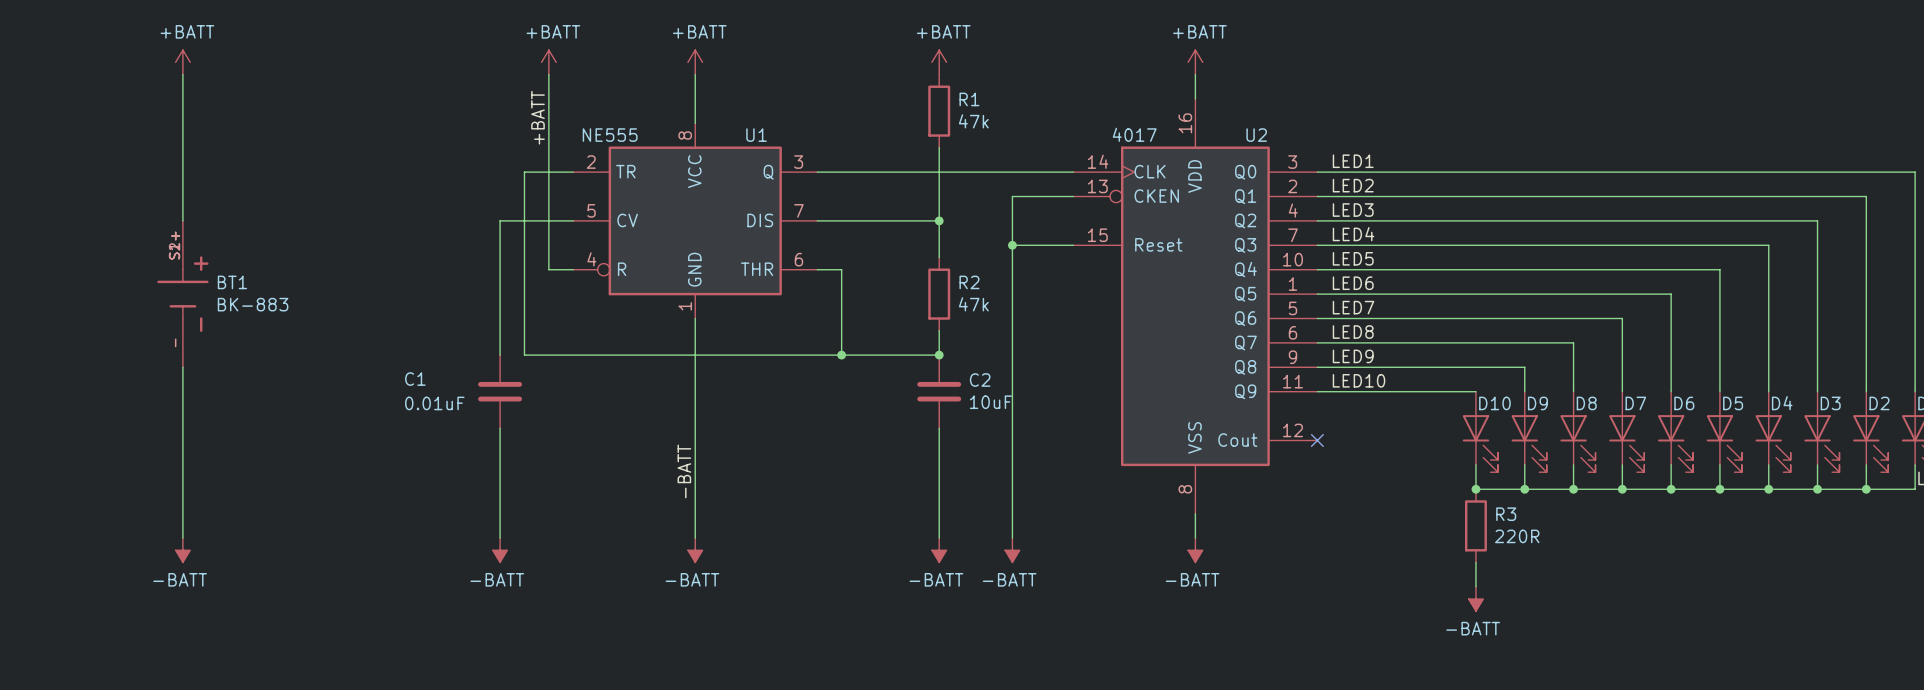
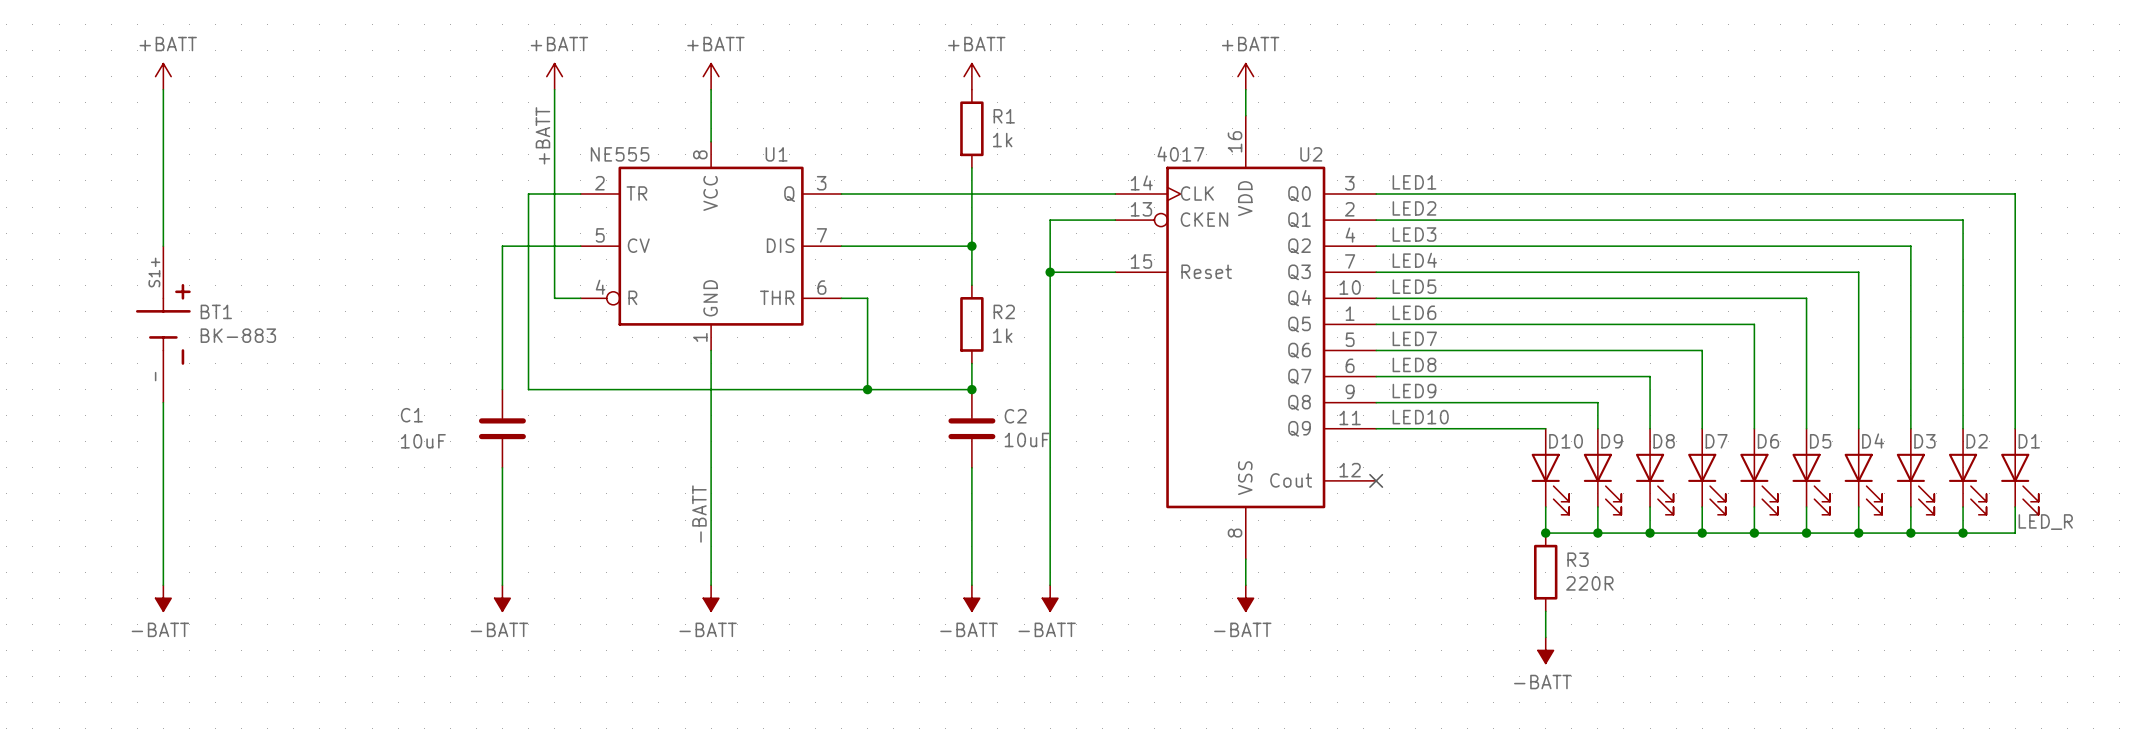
R1 value: 47k (973, 121) -> 1k (1002, 140)
BT1 symbol: [157, 220, 209, 368] -> [135, 246, 191, 403]
R2 value: 47k (973, 304) -> 1k (1002, 335)
C1 value: 0.01uF (434, 403) -> 10uF (423, 441)

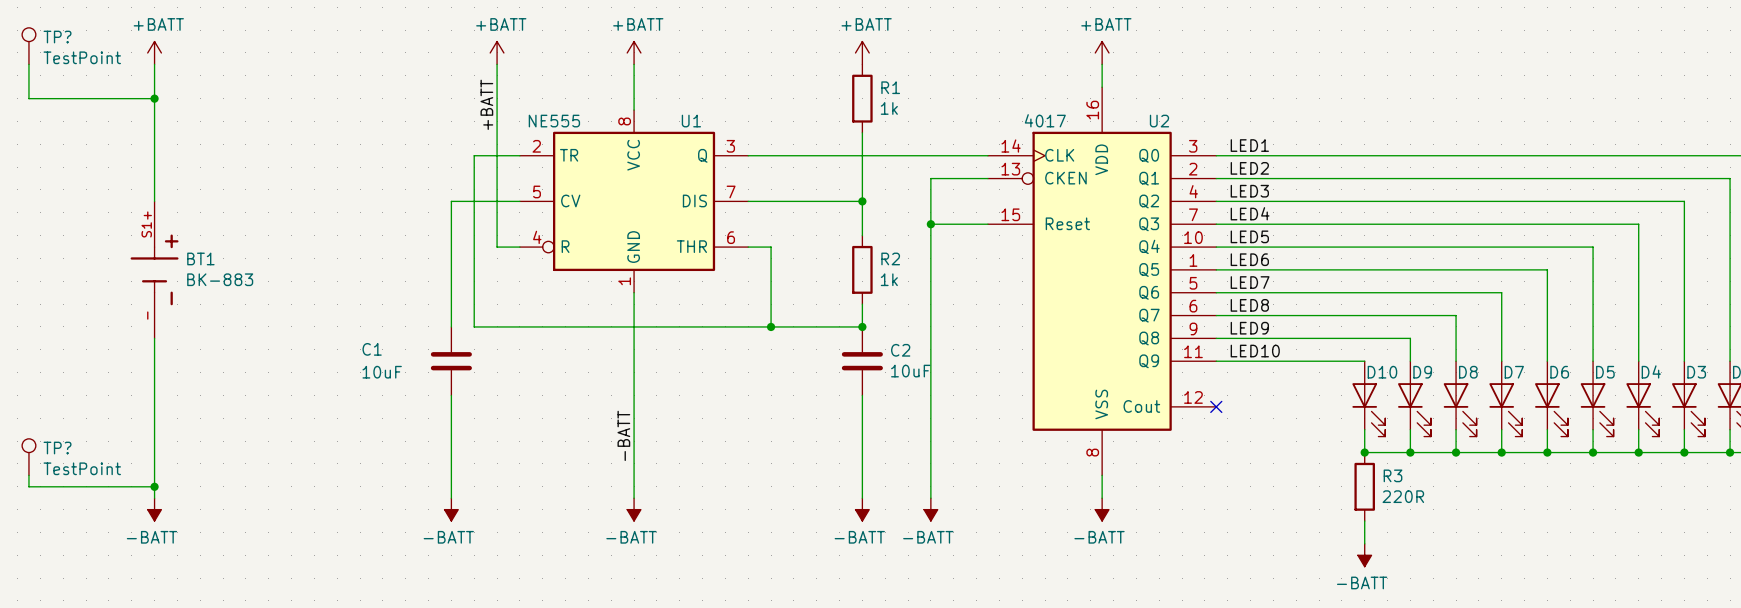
TP?: none -> TestPoint (28, 46)
wire: none -> (28, 64) (28, 98) (154, 98)
junction: none -> (154, 98)
TP?: none -> TestPoint (28, 457)
wire: none -> (28, 475) (28, 486) (154, 486)
junction: none -> (154, 486)

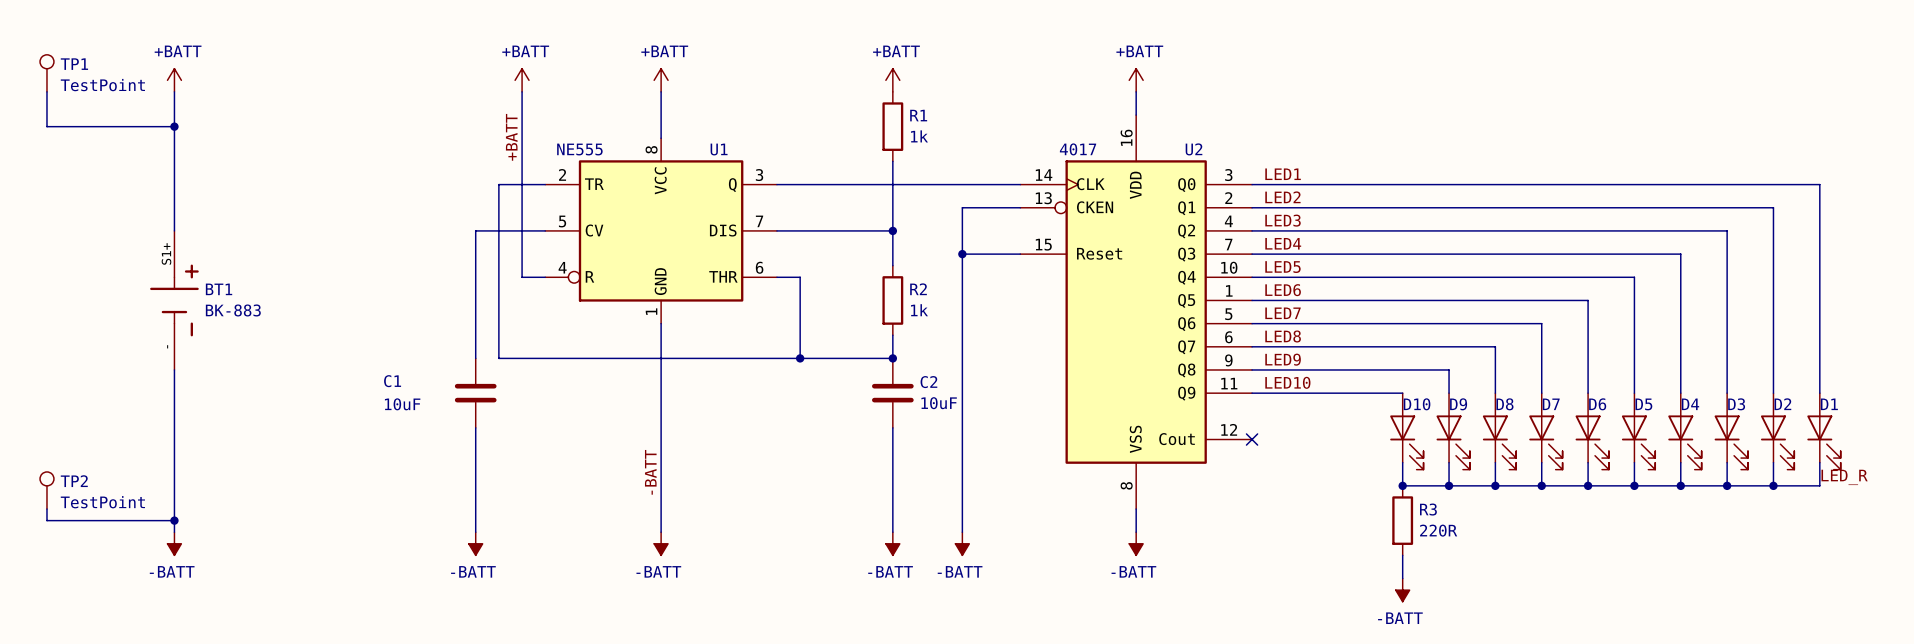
TP? name: TP? (57, 37) -> TP1 (74, 64)
TP? name: TP? (57, 448) -> TP2 (74, 481)

